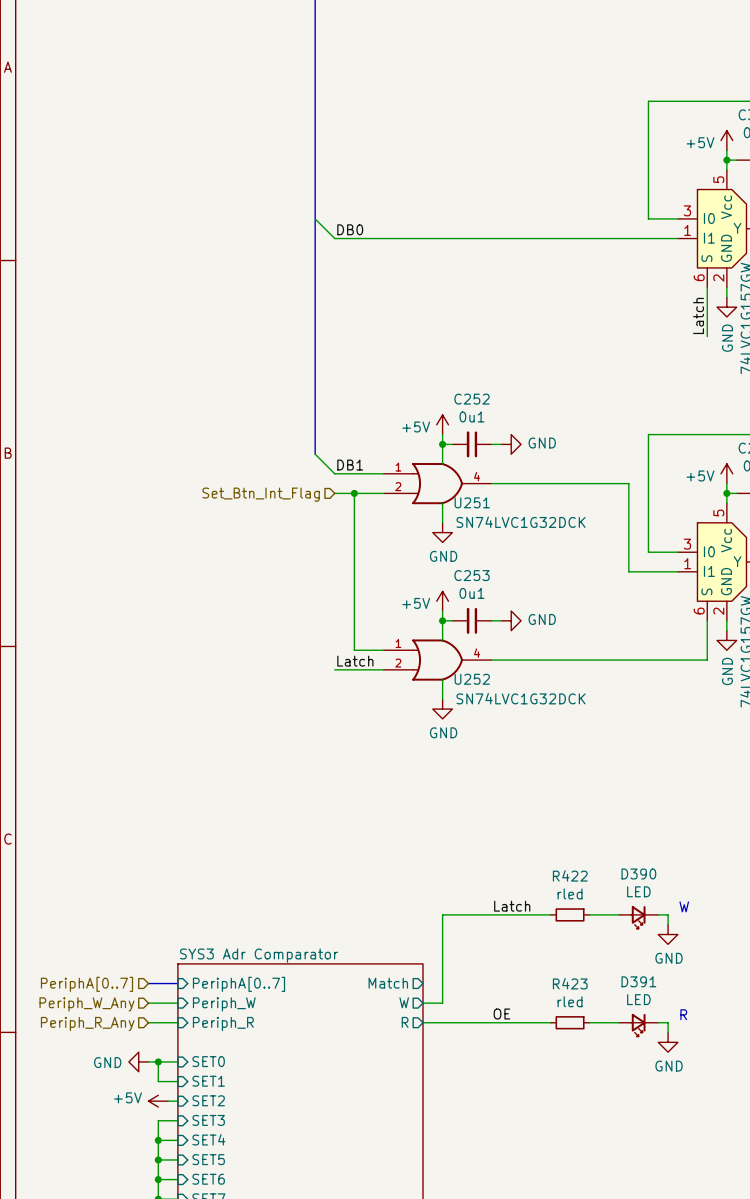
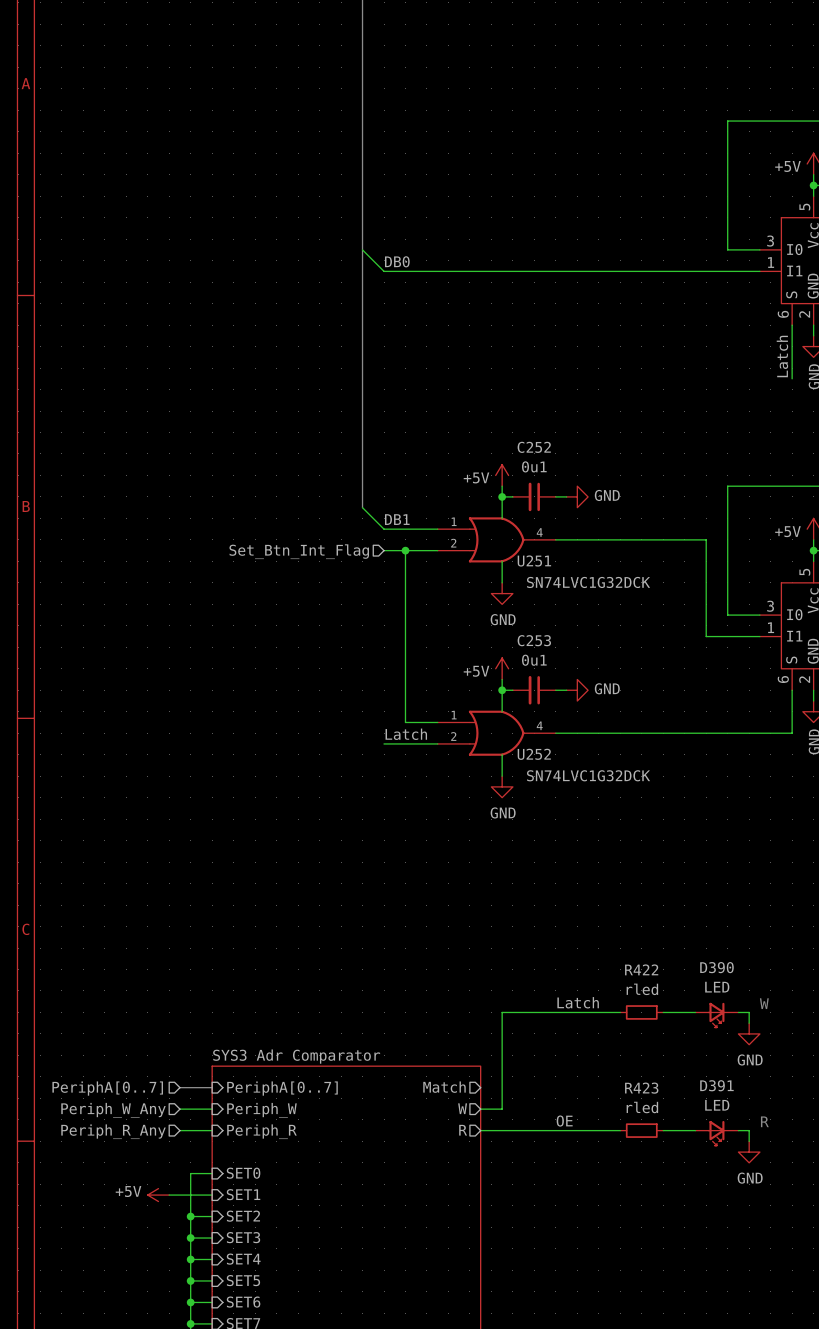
power symbol: GND (138, 1061) -> none
junction: (158, 1061) -> none
wire: none -> (169, 1195) (190, 1195) (190, 1238)
power symbol position: +5V (158, 1101) -> +5V (158, 1195)
junction: none -> (190, 1216)
junction: none -> (190, 1238)

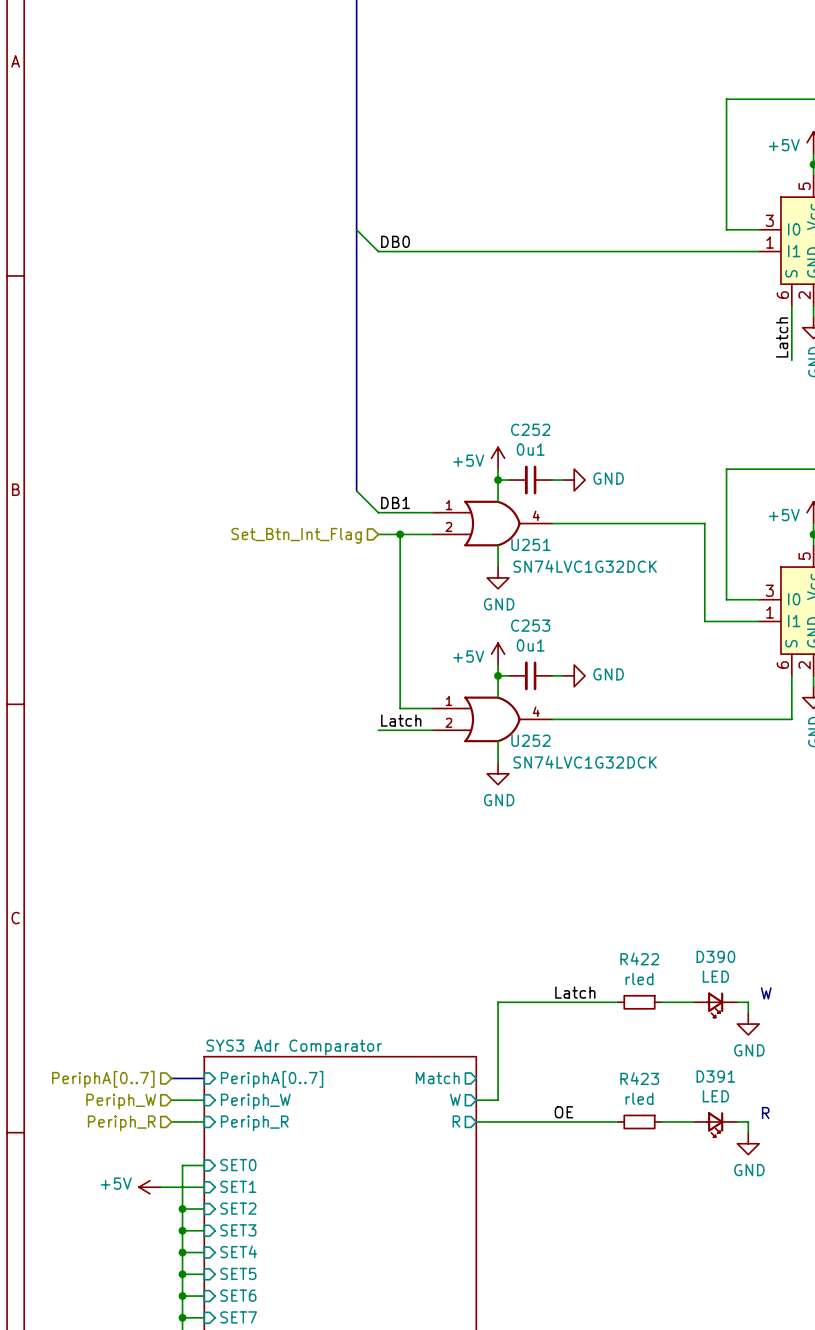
hierarchical label: Periph_W_Any (113, 1110) -> Periph_W (121, 1101)
hierarchical label: Periph_R_Any (113, 1131) -> Periph_R (121, 1123)

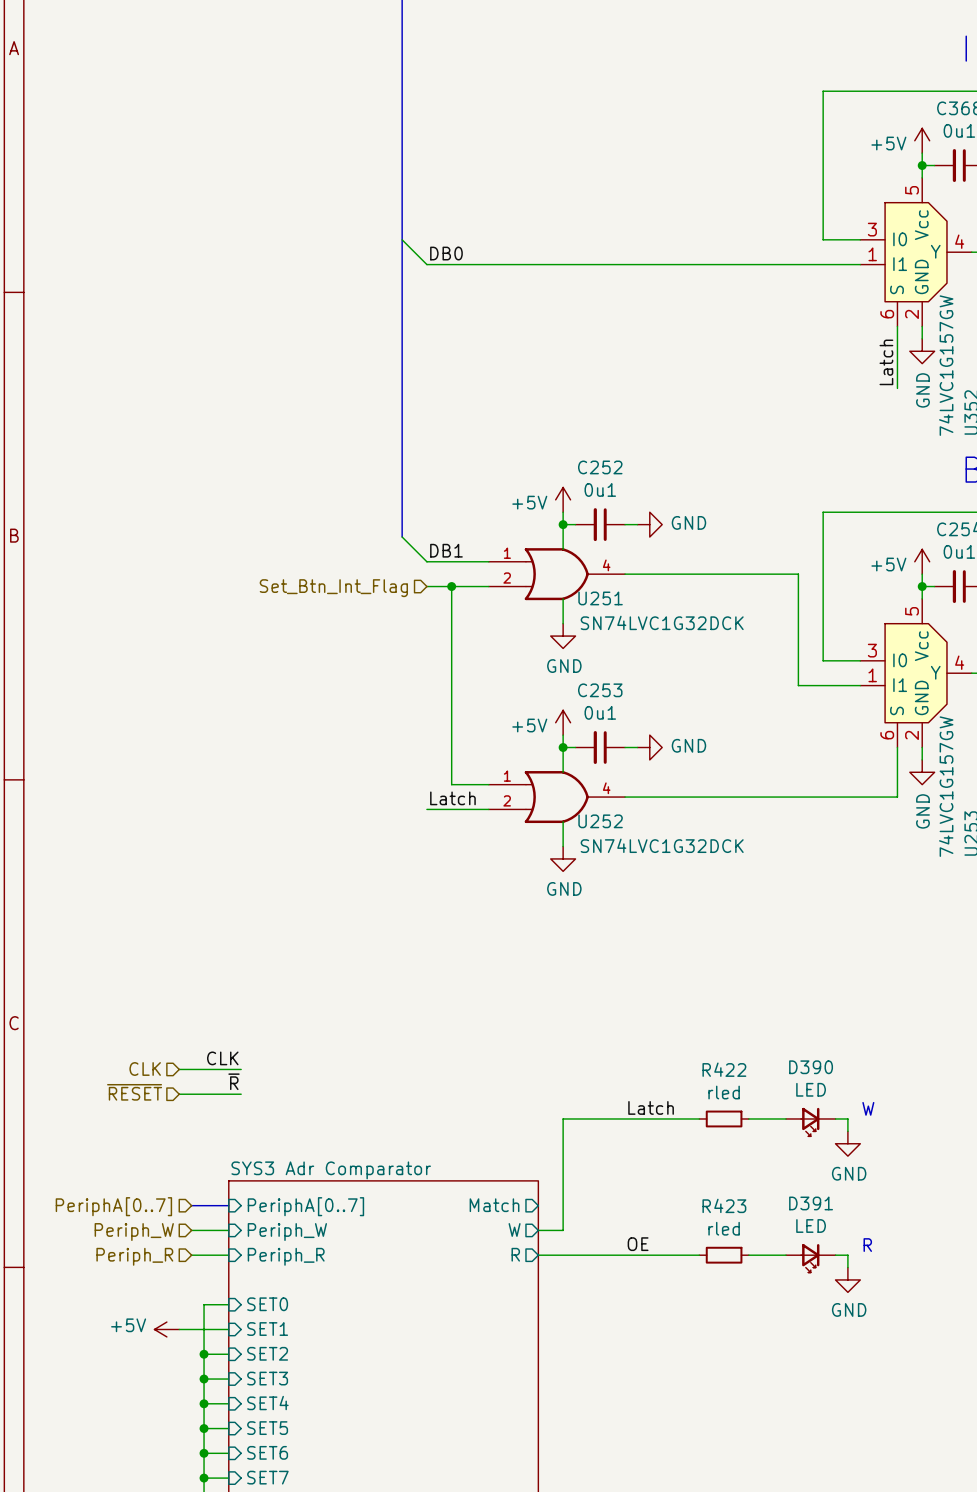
label: none -> CLK (222, 1058)
hierarchical label: none -> CLK (145, 1068)
wire: none -> (179, 1069) (241, 1069)
label: none -> ~{R} (234, 1081)
hierarchical label: none -> ~{RESET} (134, 1092)
wire: none -> (179, 1094) (241, 1094)

